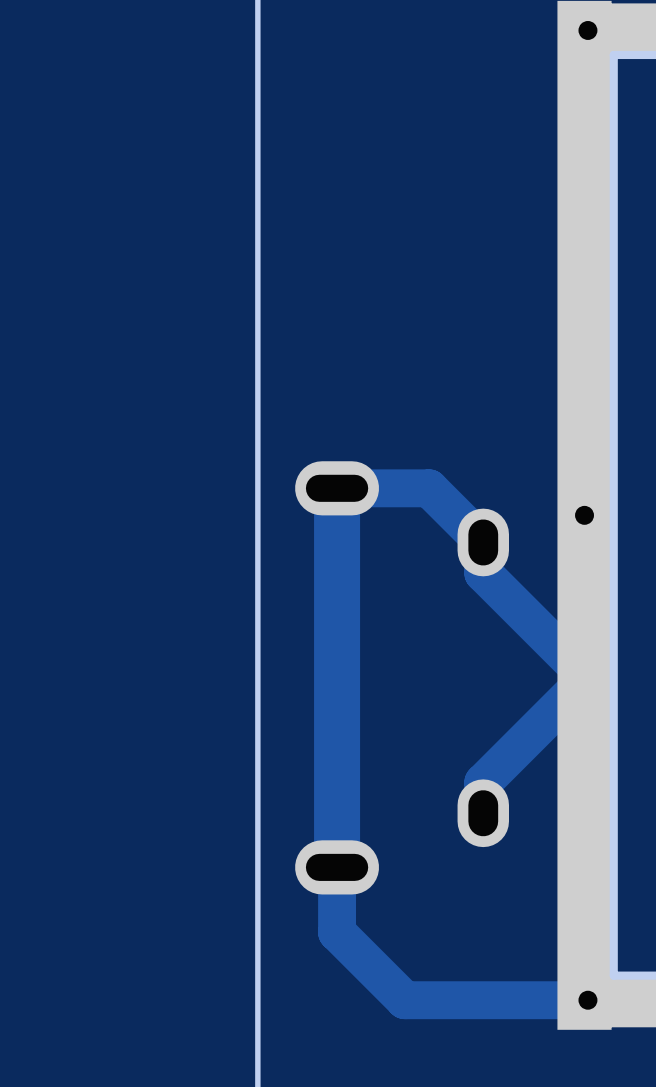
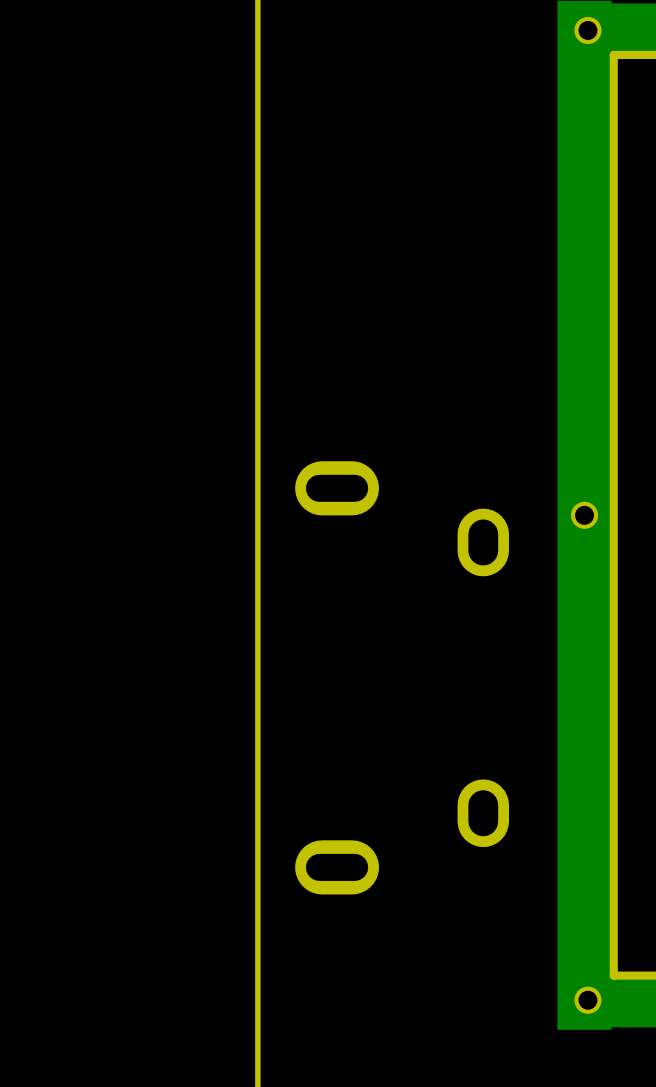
track: (483, 813) (483, 782) (587, 677) (483, 573) (483, 542) (429, 488) (337, 488) (337, 932) (404, 1000) (587, 1000) -> none

